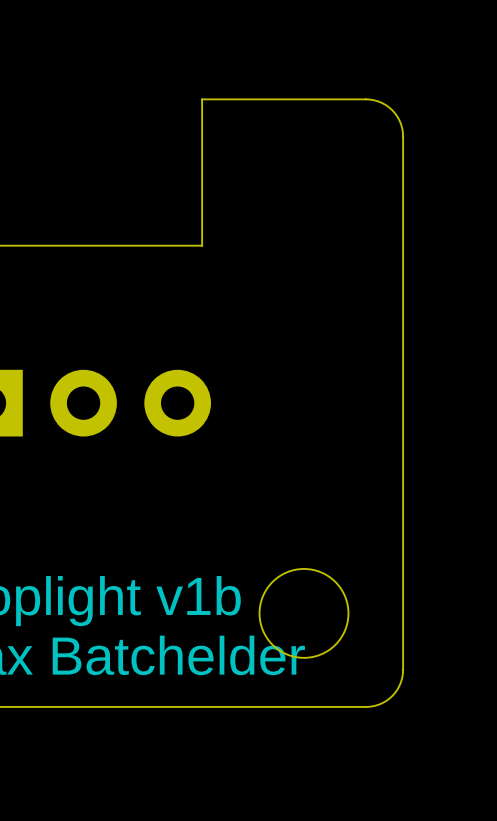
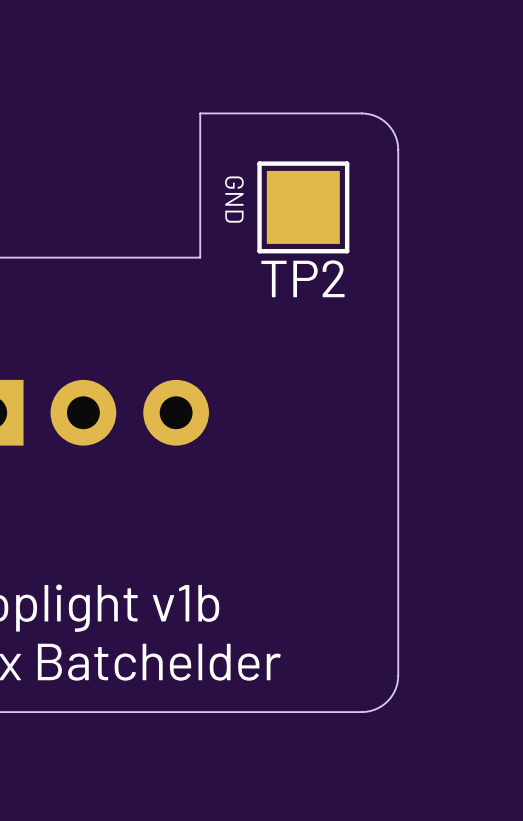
text: none -> GND (234, 199)
TP2: none -> (303, 207)
round board edge: [258, 568, 350, 659] -> none

